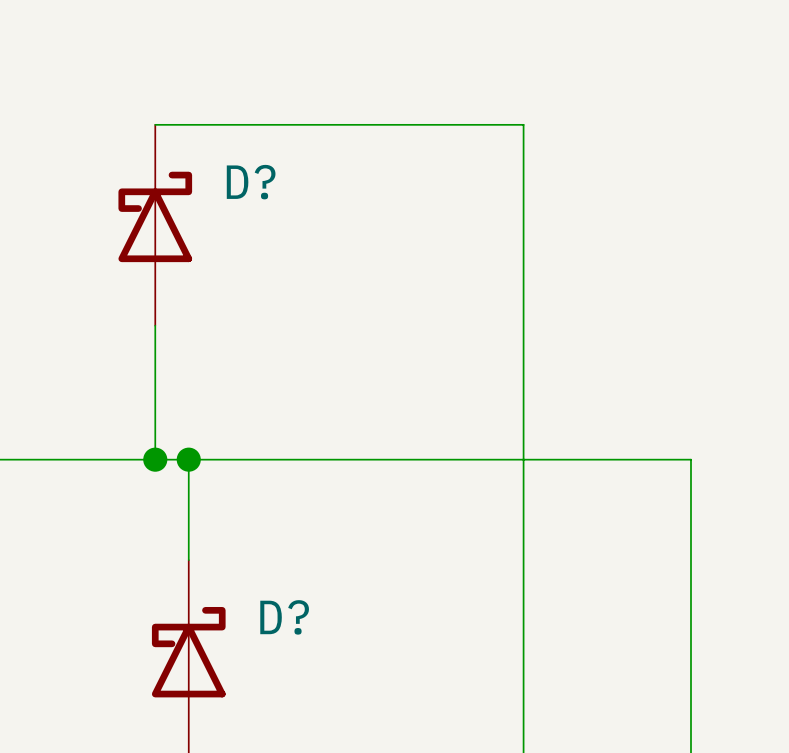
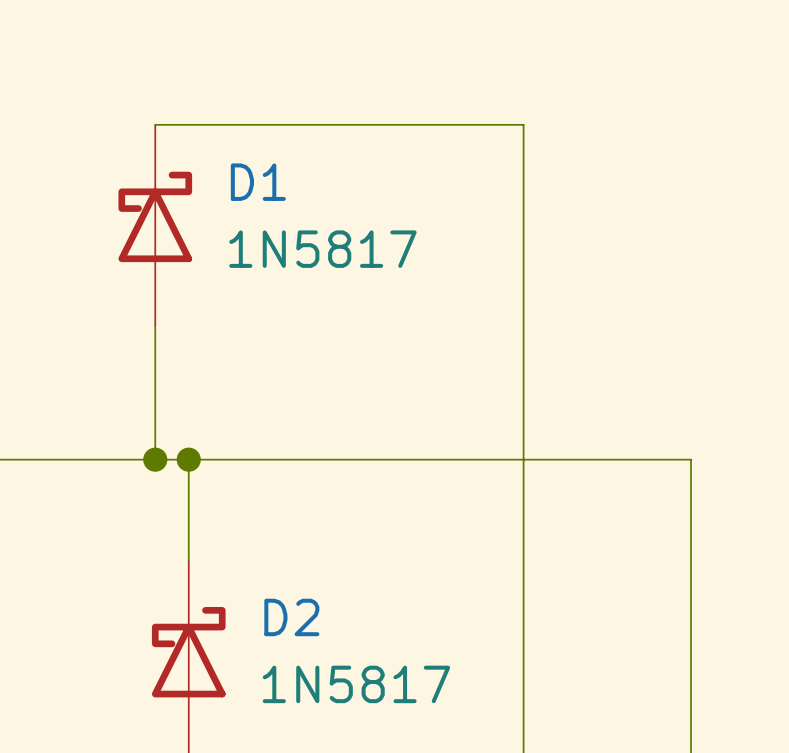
D? name: D? (251, 182) -> D1 (258, 182)
D? value: none -> 1N5817 (322, 249)
D? name: D? (284, 617) -> D2 (291, 617)
D? value: none -> 1N5817 (356, 684)

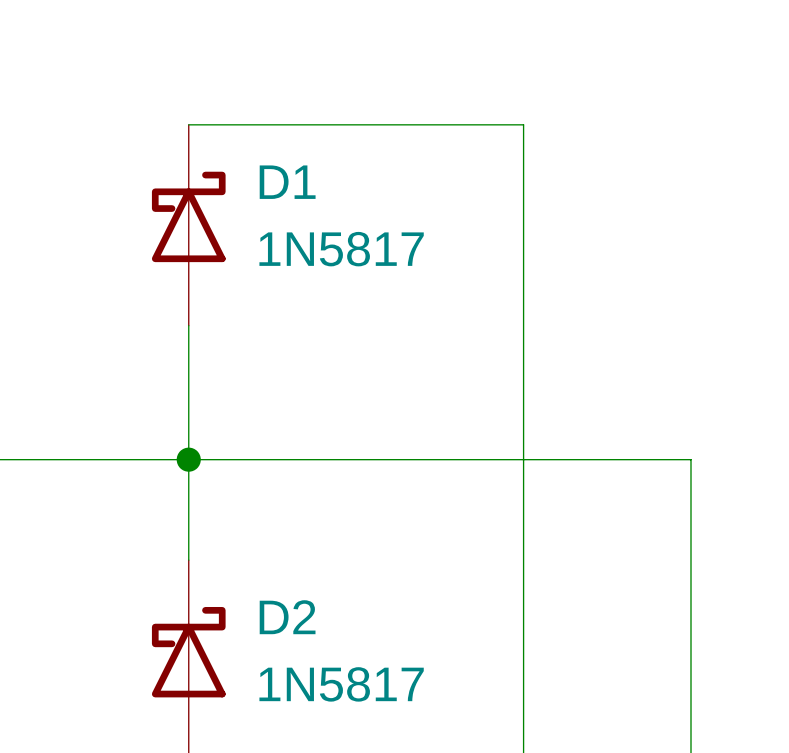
wire: (155, 124) (188, 124) -> none
D1 position: (155, 225) -> (188, 225)
wire: (155, 325) (155, 459) -> (188, 325) (188, 459)
junction: (155, 459) -> none

